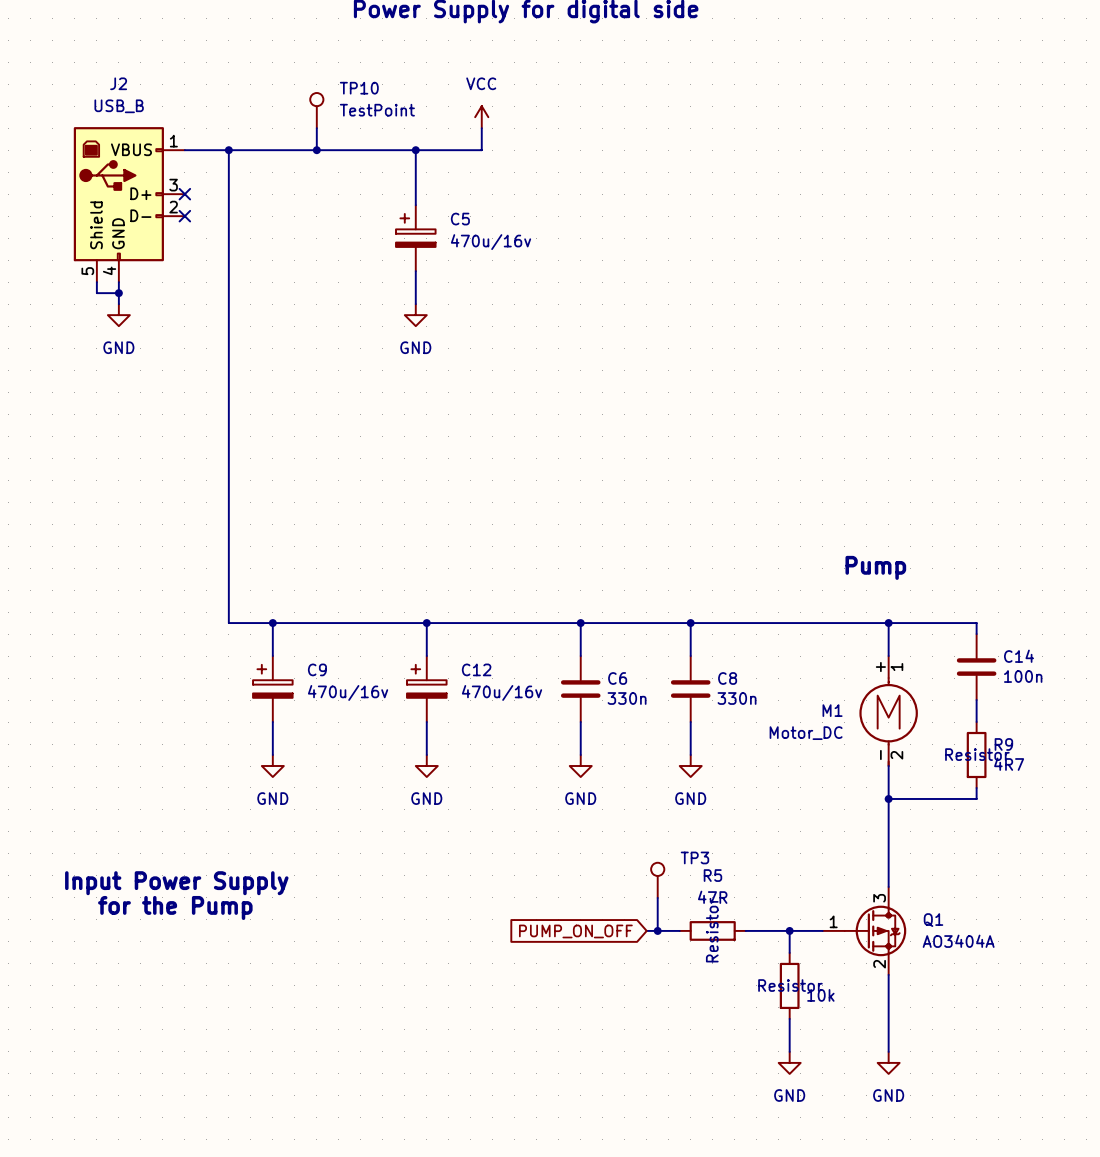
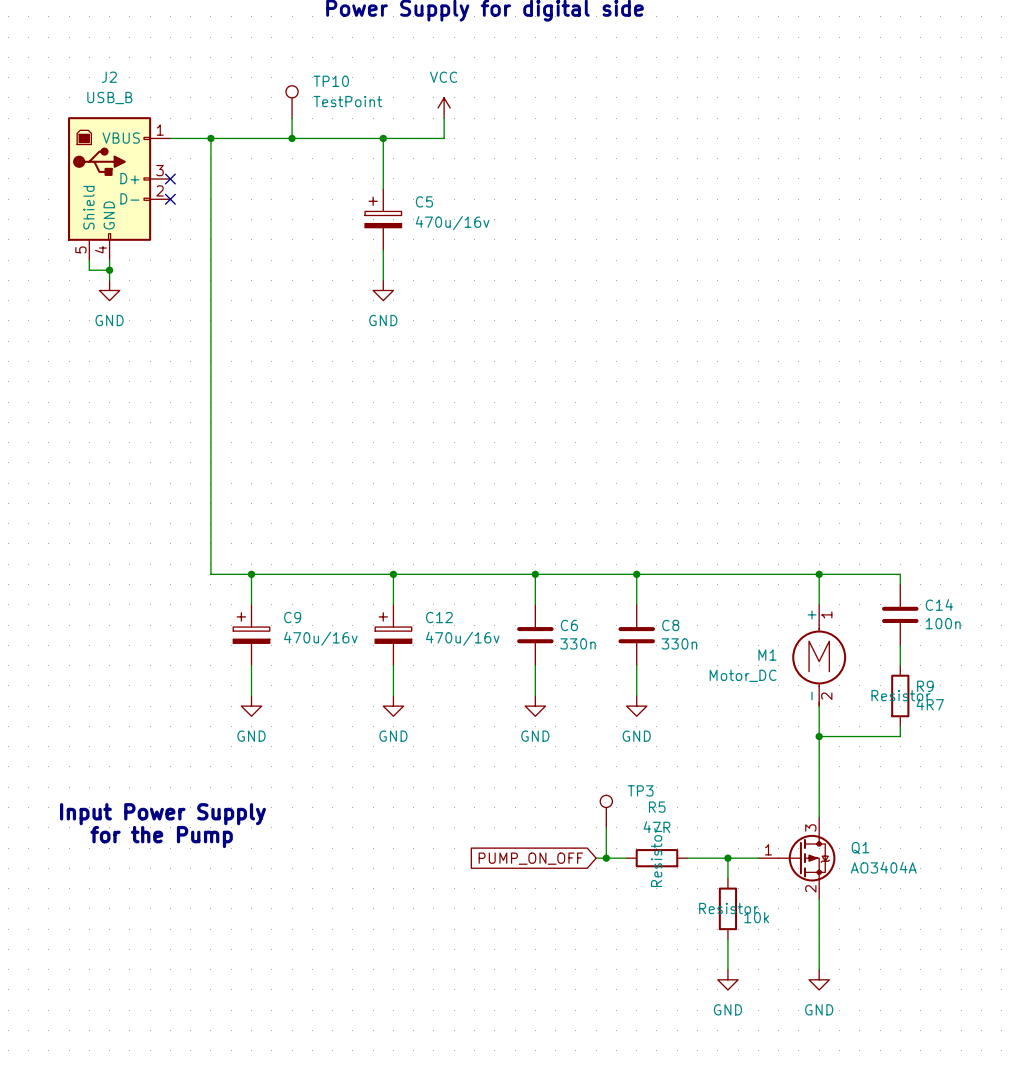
text: Pump (875, 567) -> none

